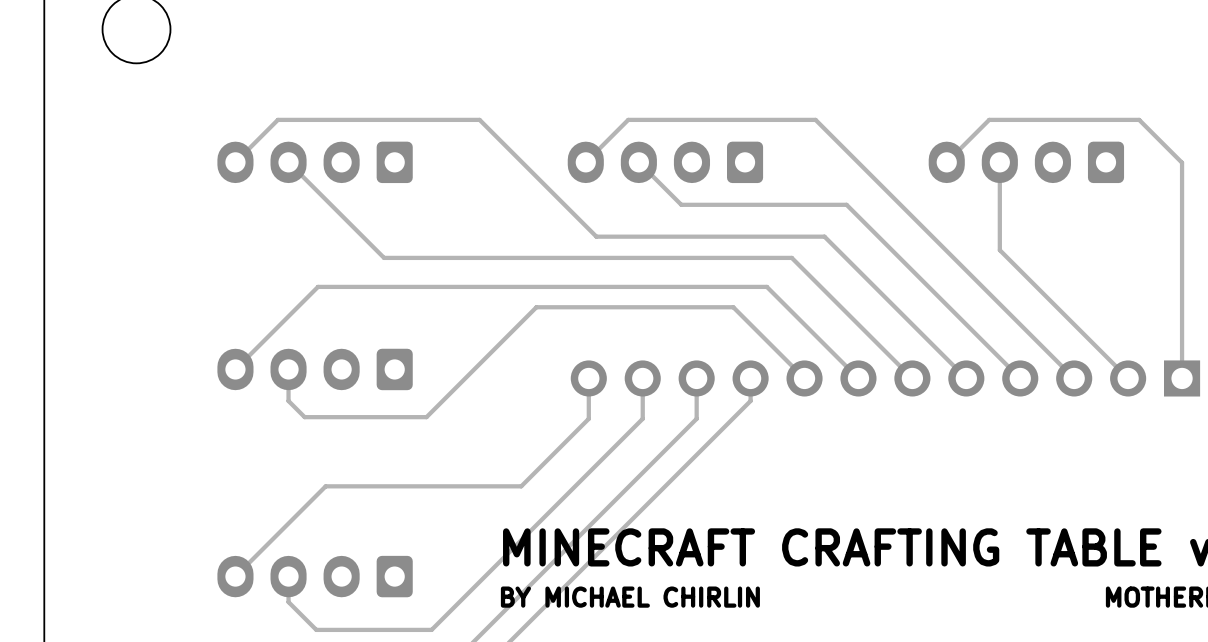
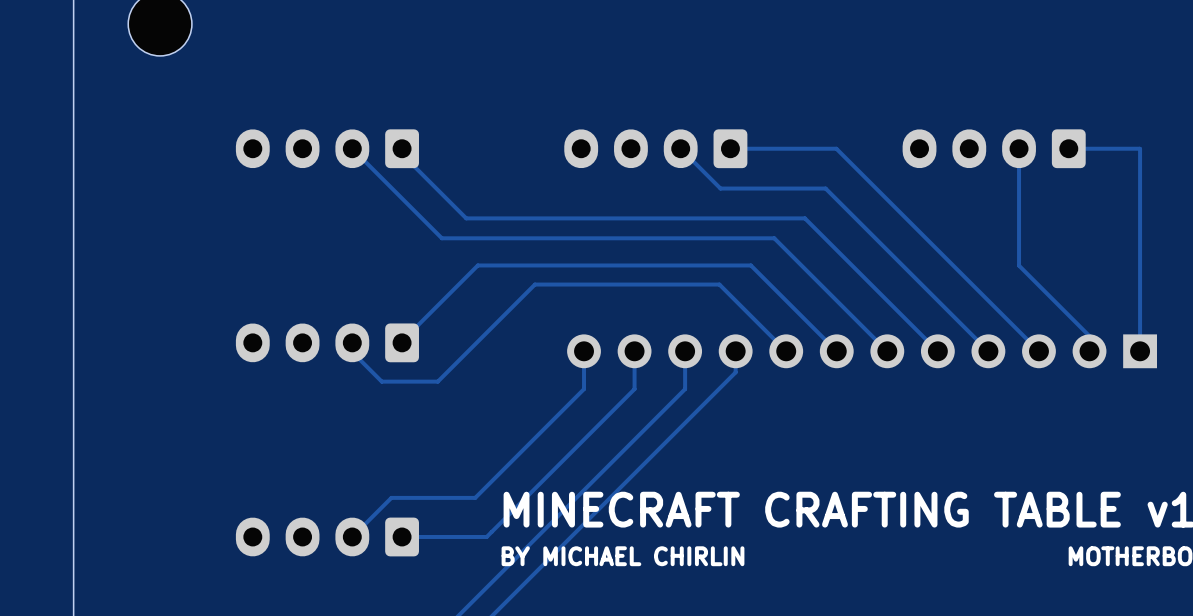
track: (235, 162) (277, 119) (479, 119) (596, 236) -> (402, 148) (402, 154) (466, 218) (591, 218)
track: (288, 162) (384, 257) (437, 257) -> (352, 148) (441, 238)
track: (638, 162) (681, 204) (734, 204) -> (680, 148) (720, 188)
track: (858, 162) (815, 119) (628, 119) (585, 162) -> (836, 148) (730, 148)
track: (999, 162) (999, 250) (1128, 378) -> (1019, 148) (1019, 265) (1089, 336) (1089, 351)
track: (1181, 162) (1139, 119) (989, 119) (946, 162) -> (1139, 148) (1068, 148)
track: (475, 286) (318, 286) (235, 369) -> (477, 265) (402, 342)
track: (288, 369) (288, 401) (304, 417) (426, 417) (432, 410) -> (352, 342) (352, 352) (381, 381) (437, 381)
track: (521, 486) (325, 486) (235, 576) -> (520, 452) (475, 497) (391, 497) (352, 536)
track: (484, 576) (431, 629) (316, 629) (288, 602) (288, 576) -> (486, 536) (402, 536)

